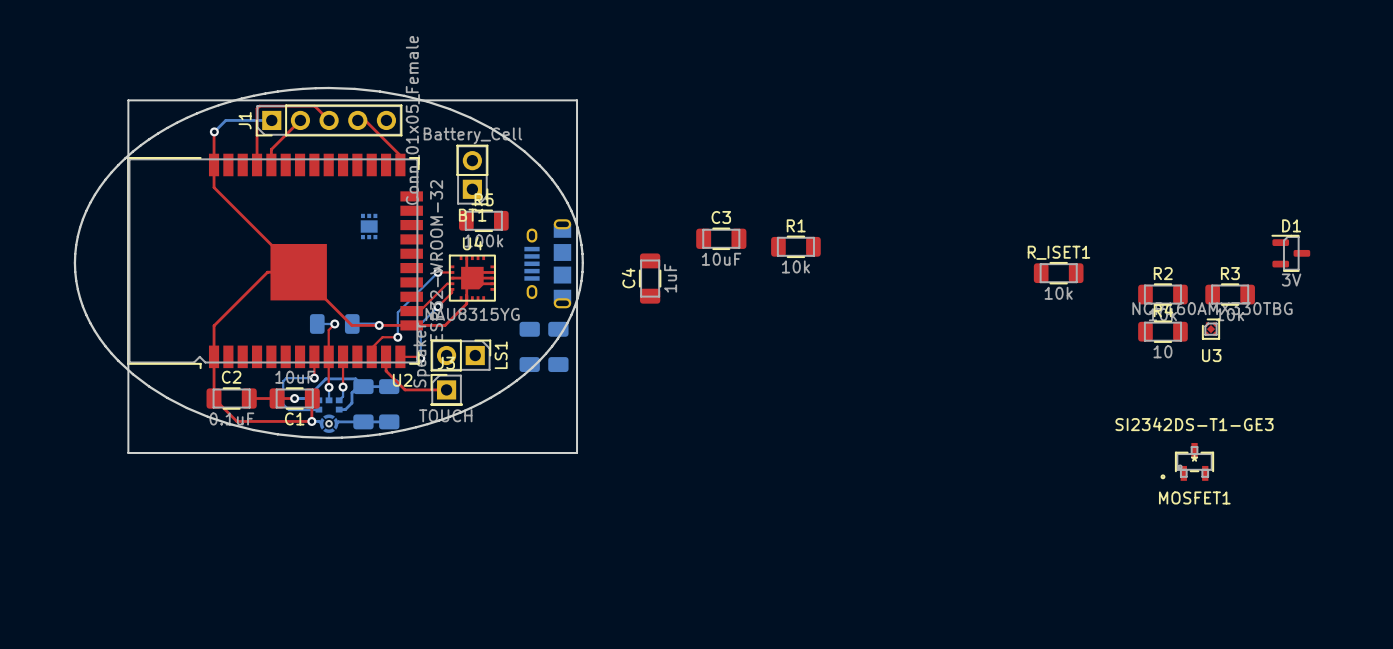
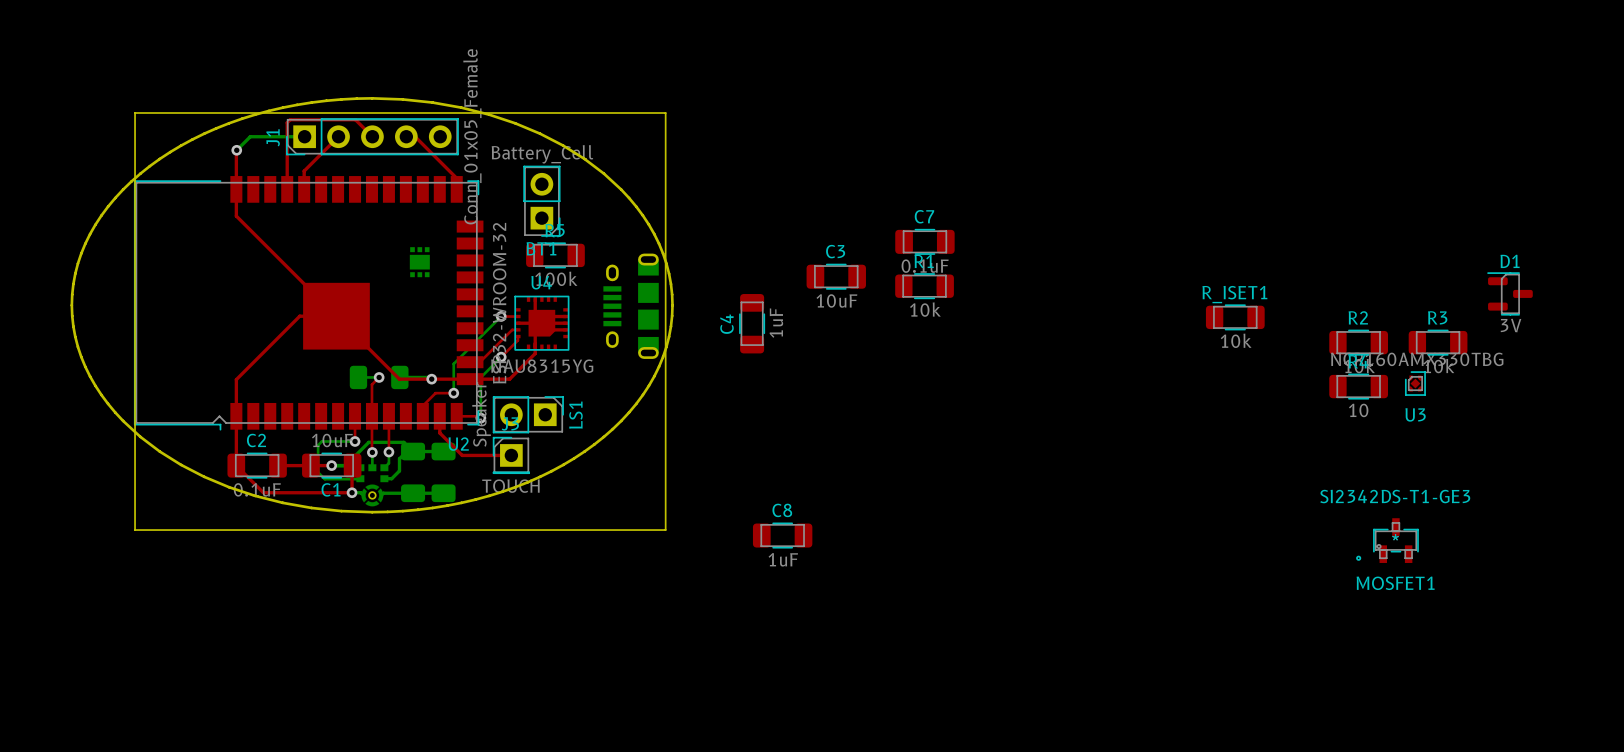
C7: none -> 0.1uF (924, 241)
part: (529, 346) -> none
part: (558, 346) -> none
C8: none -> 1uF (782, 535)

